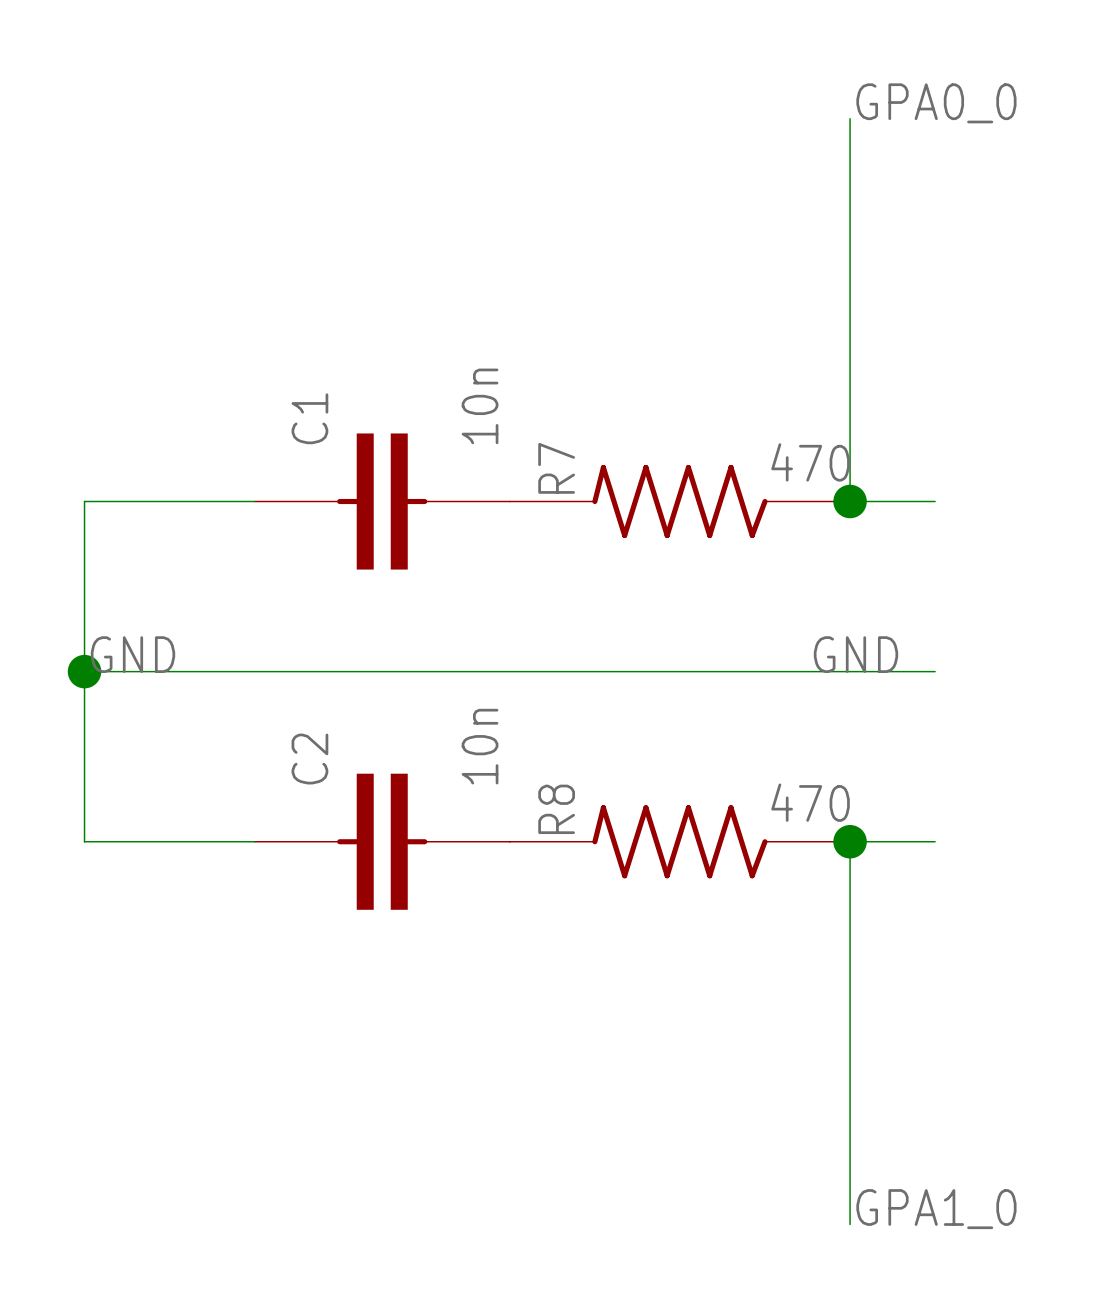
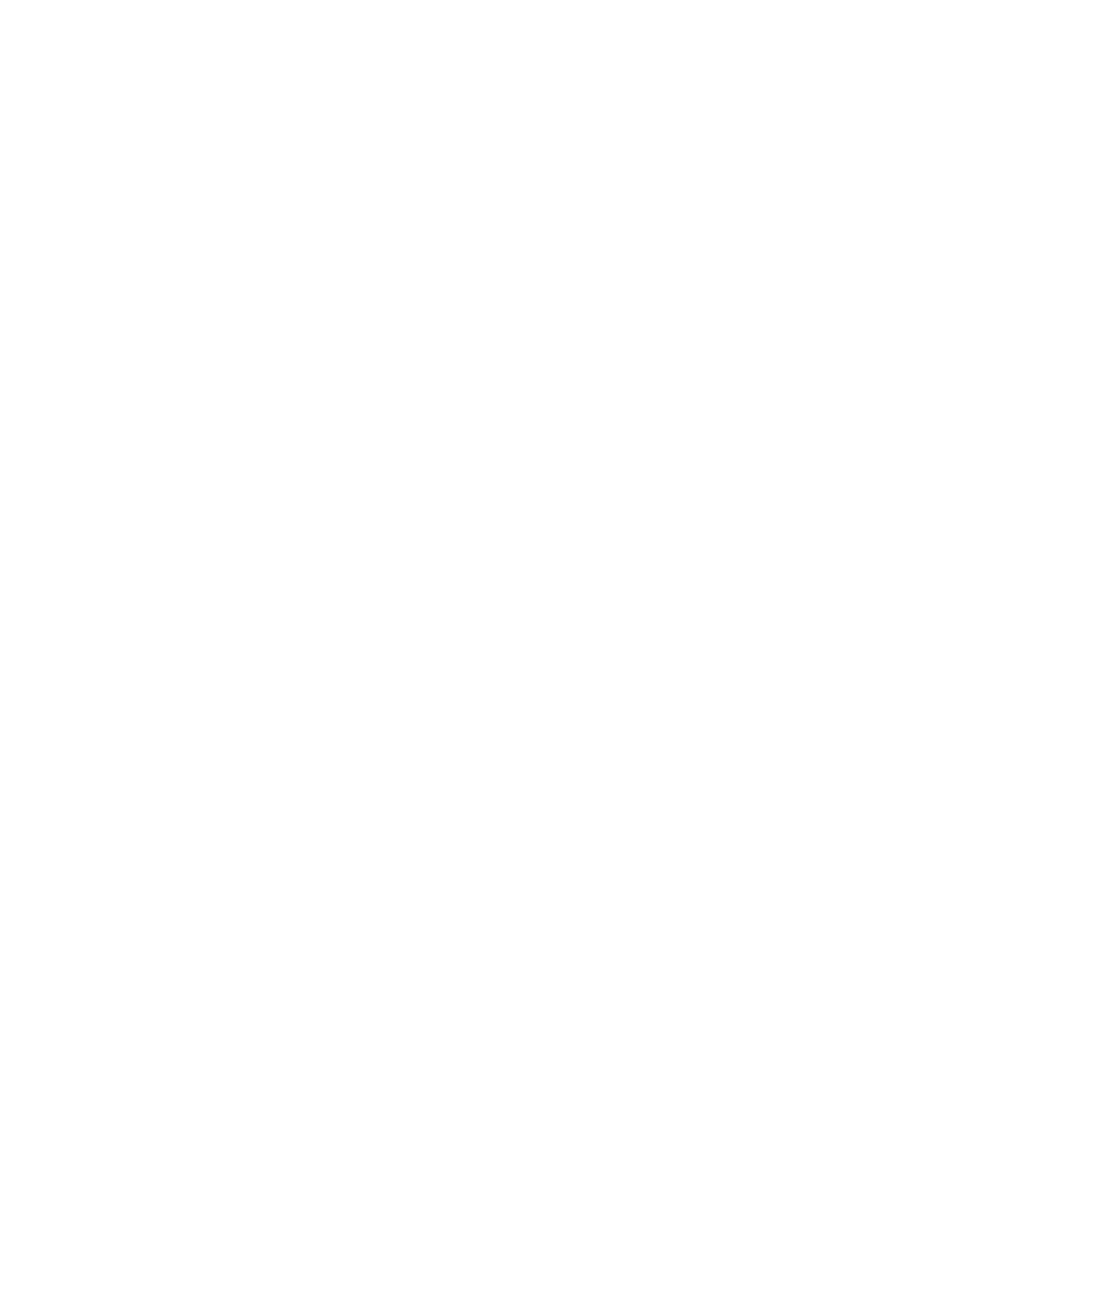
label: GPA0_0 (936, 103) -> none
wire: (850, 118) (850, 501) (935, 501) -> none
wire: (254, 501) (84, 501) (84, 841) (254, 841) -> none
C1: 10n (382, 501) -> none
R7: 470 (679, 501) -> none
junction: (850, 501) -> none
label: GND (132, 654) -> none
label: GND (855, 654) -> none
wire: (84, 671) (935, 671) -> none
junction: (84, 671) -> none
C2: 10n (382, 841) -> none
R8: 470 (679, 841) -> none
junction: (850, 841) -> none
wire: (935, 841) (850, 841) (850, 1224) -> none
label: GPA1_0 (936, 1209) -> none

